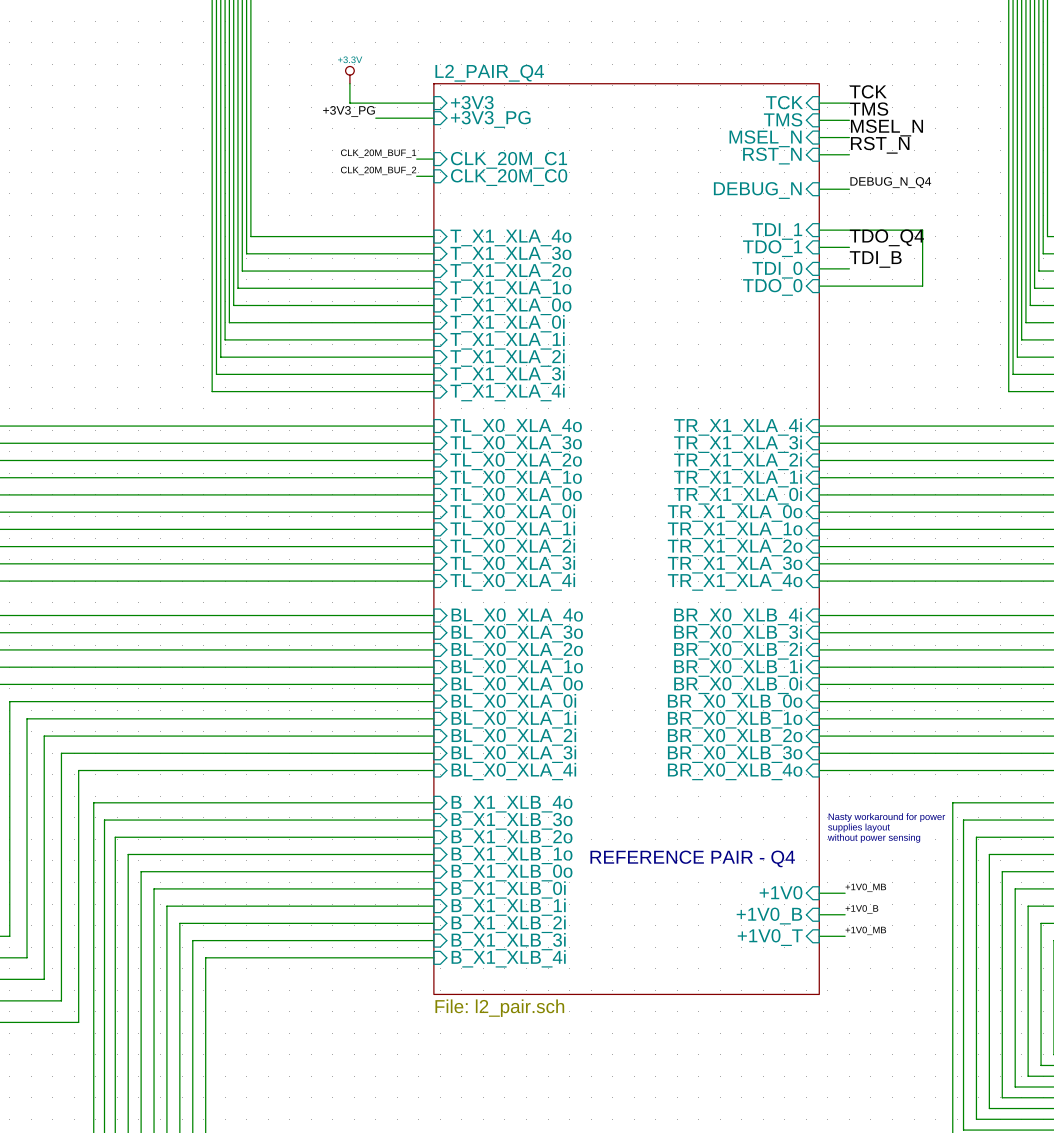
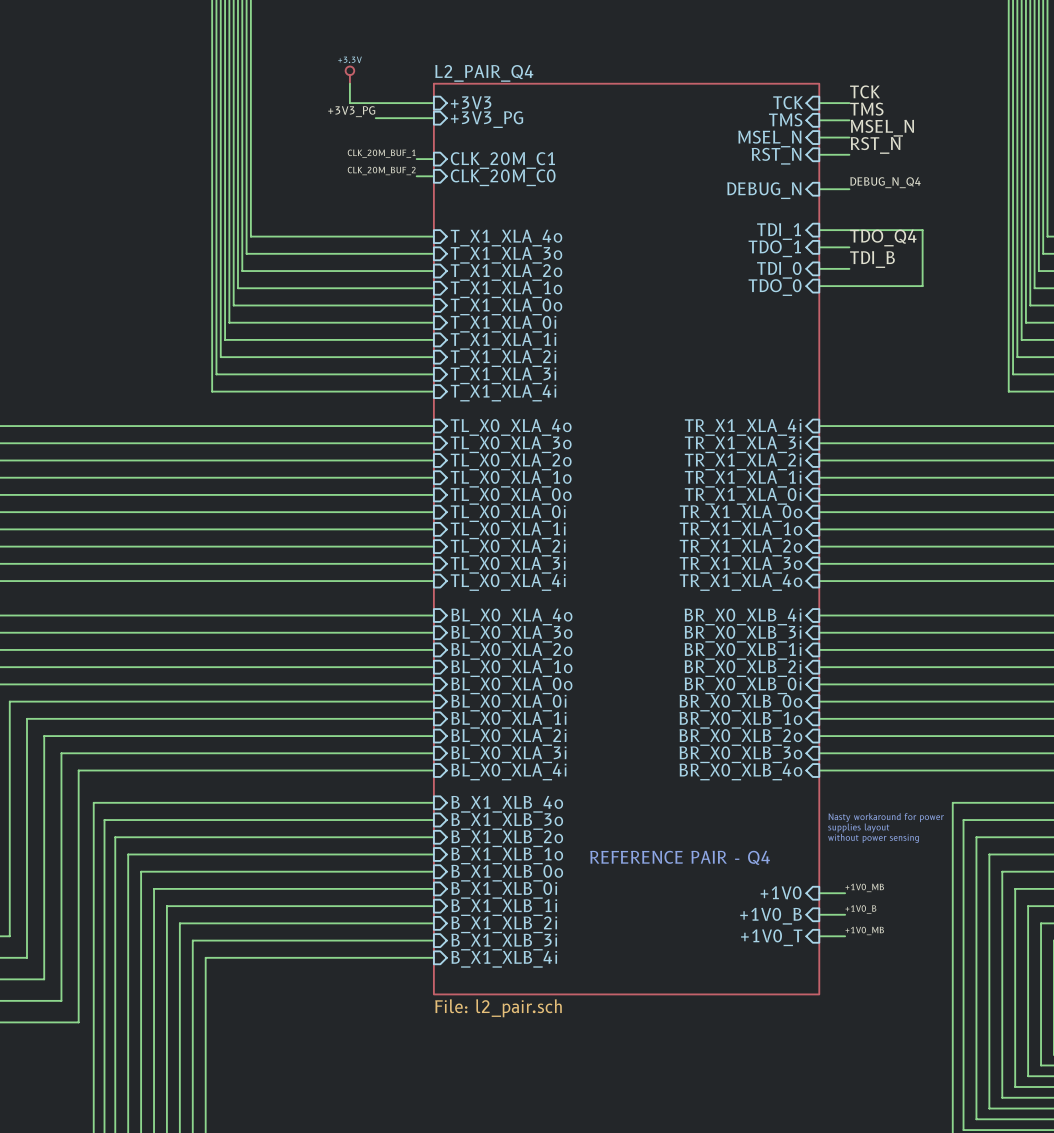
sheet pin: BR_X0_XLB_2i (738, 650) -> BR_X0_XLB_1i (743, 651)
sheet pin: BR_X0_XLB_1i (738, 668) -> BR_X0_XLB_2i (743, 668)

